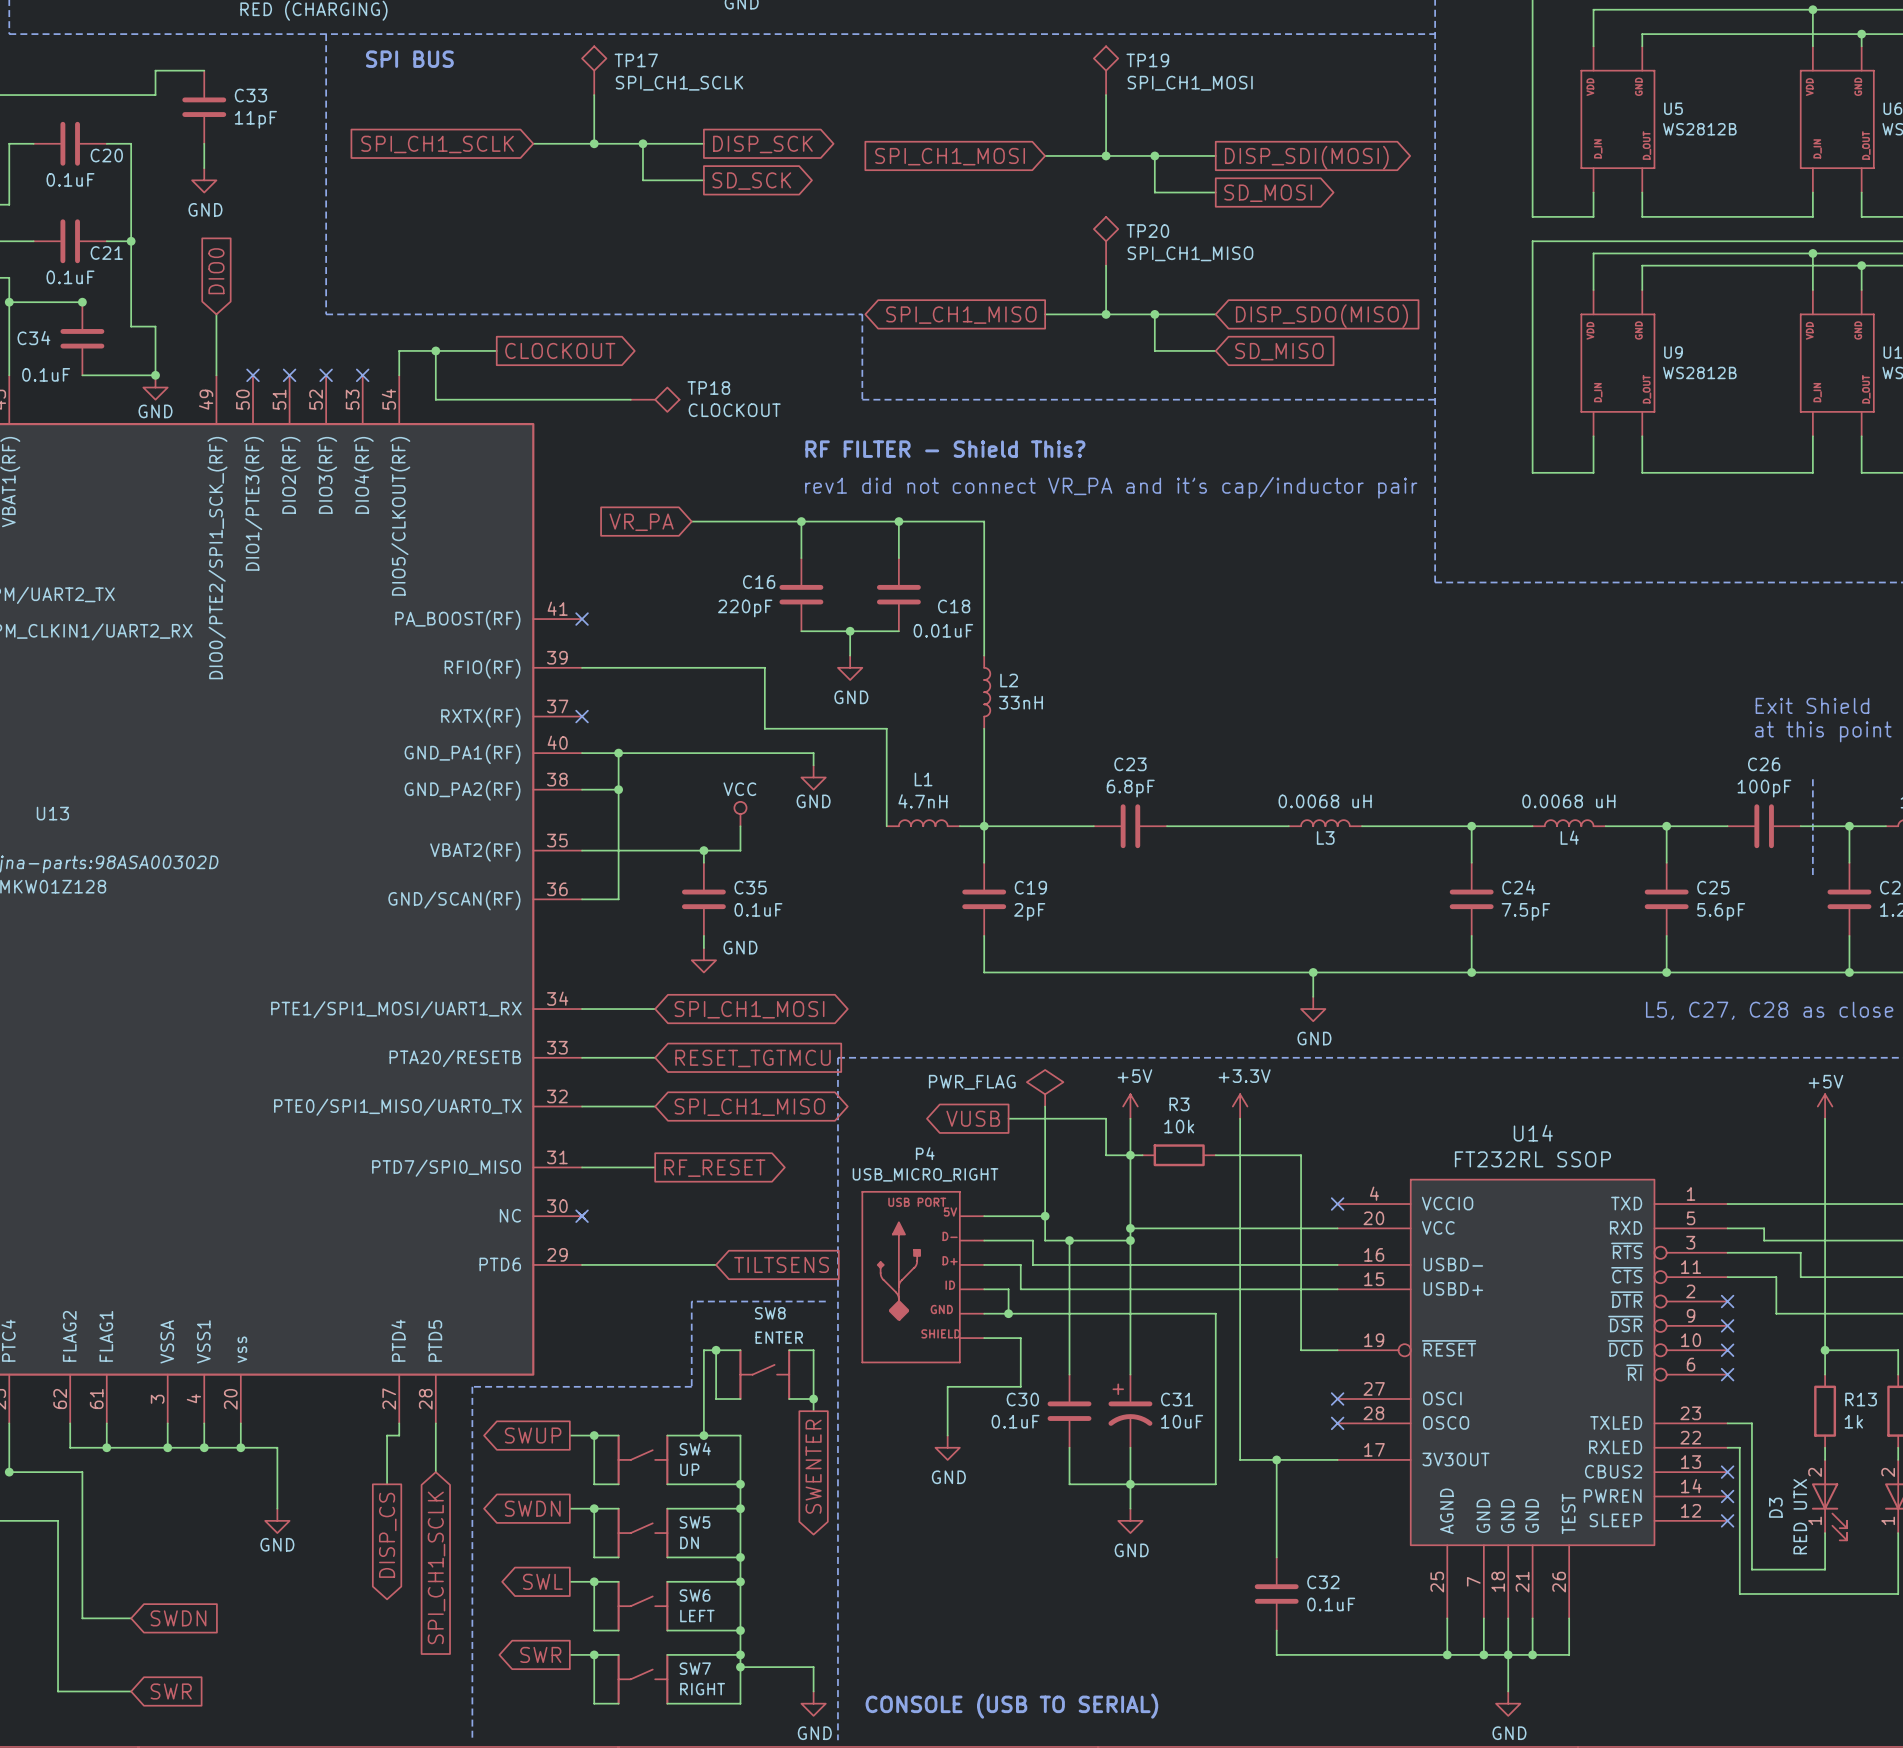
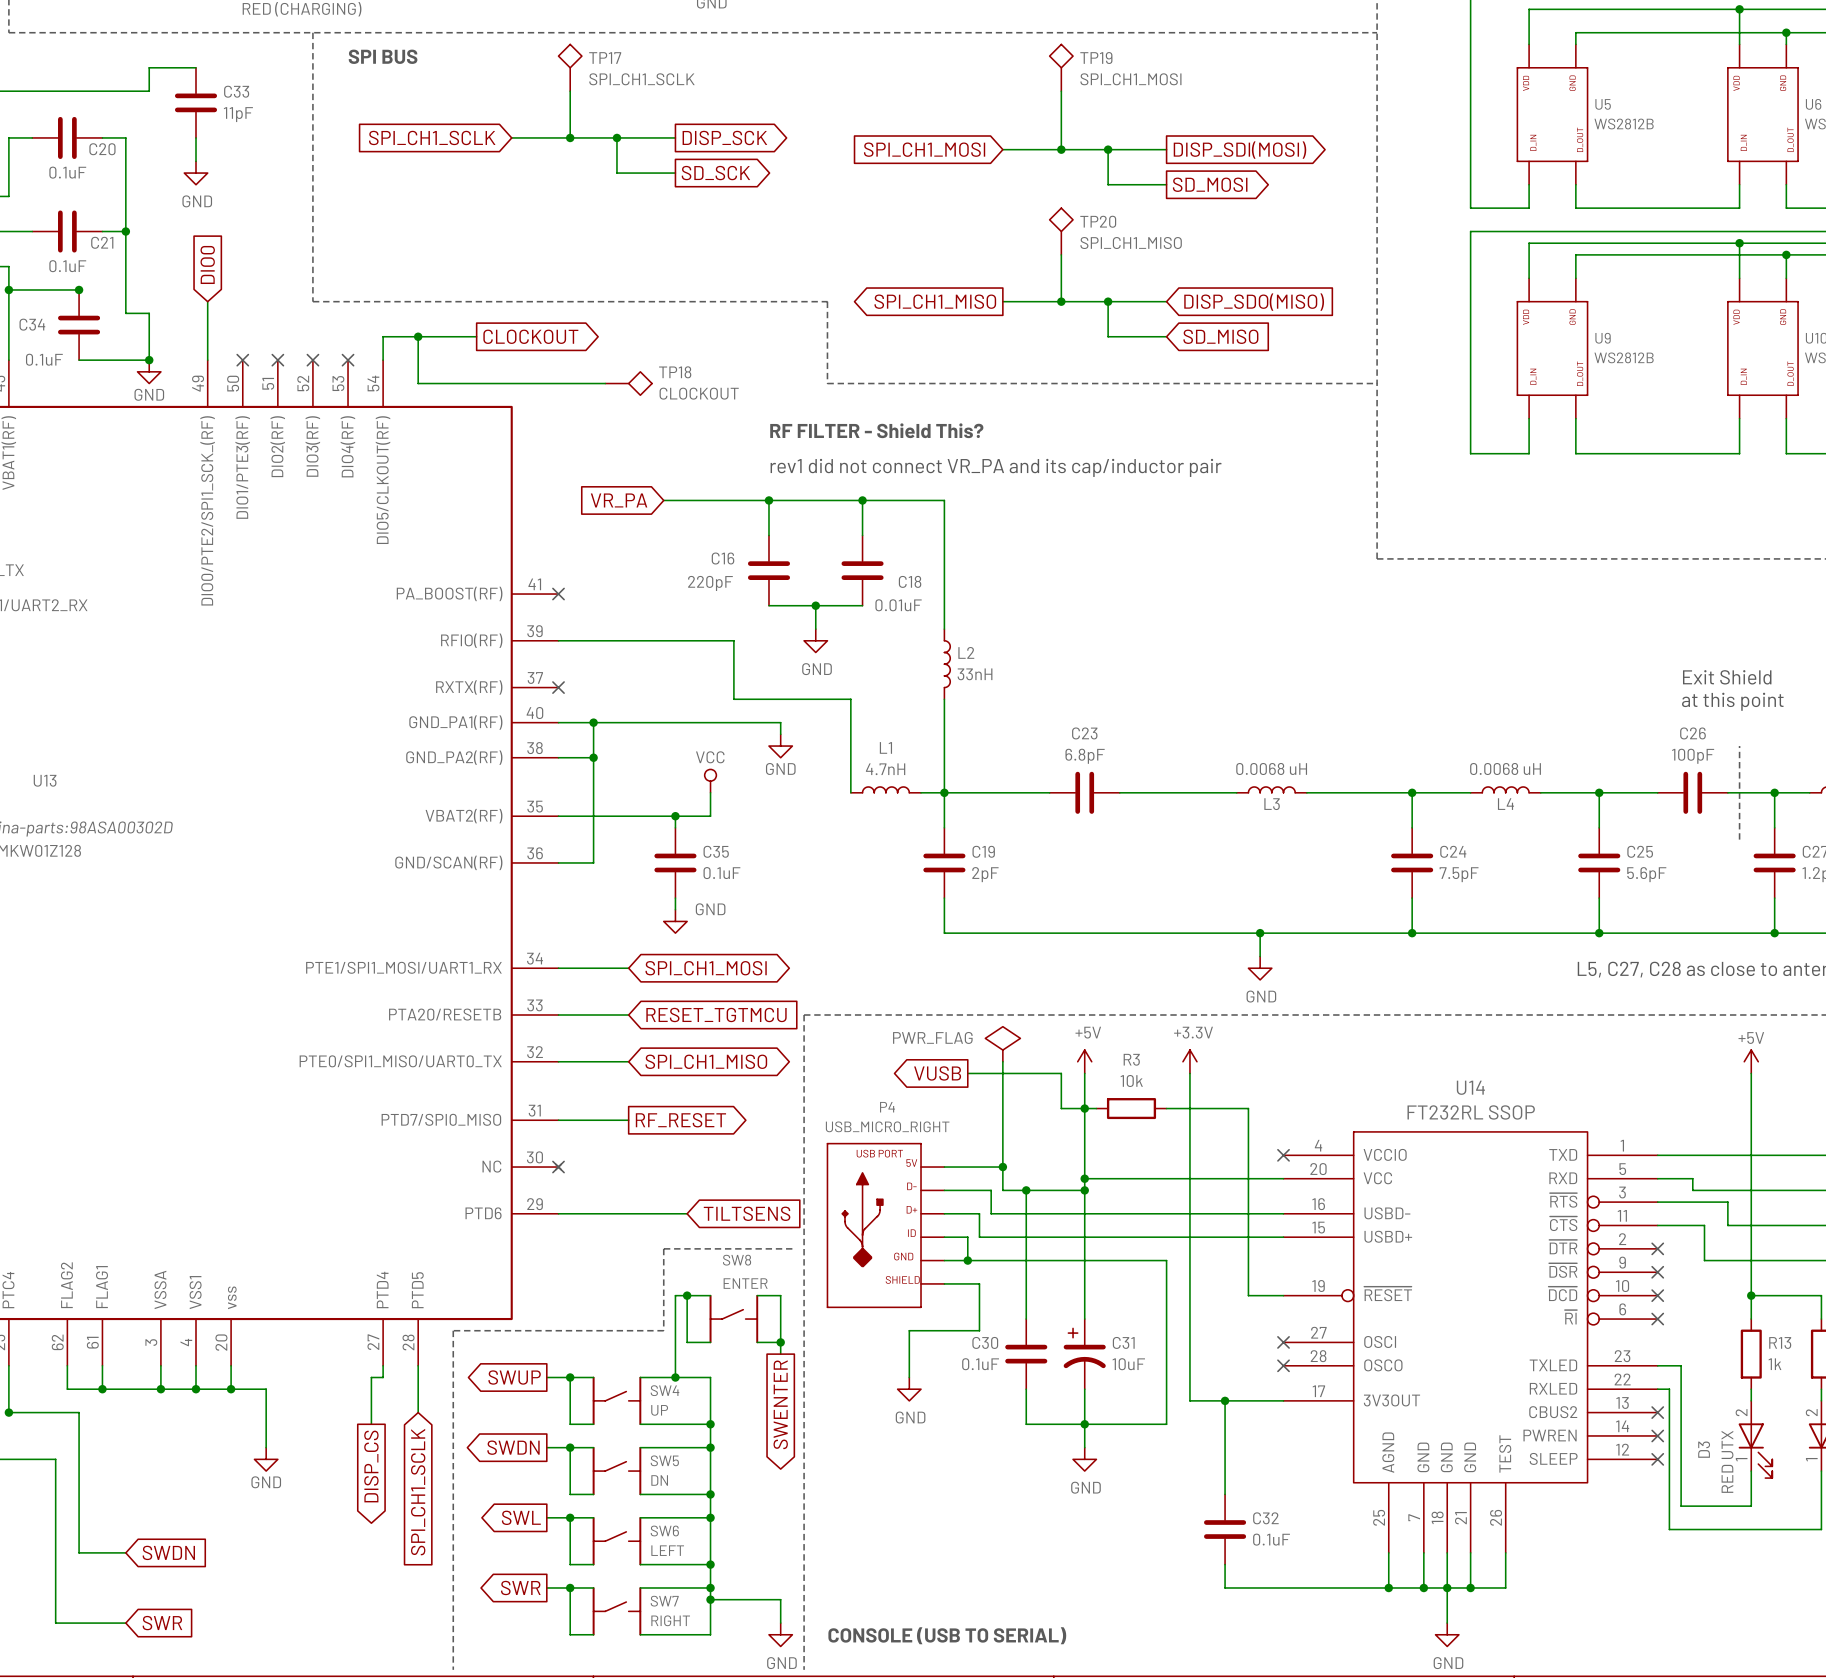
text: rev1 did not connect VR_PA and it’s cap/inductor pair (1111, 487) -> rev1 did not connect VR_PA and its cap/inductor pair (996, 467)

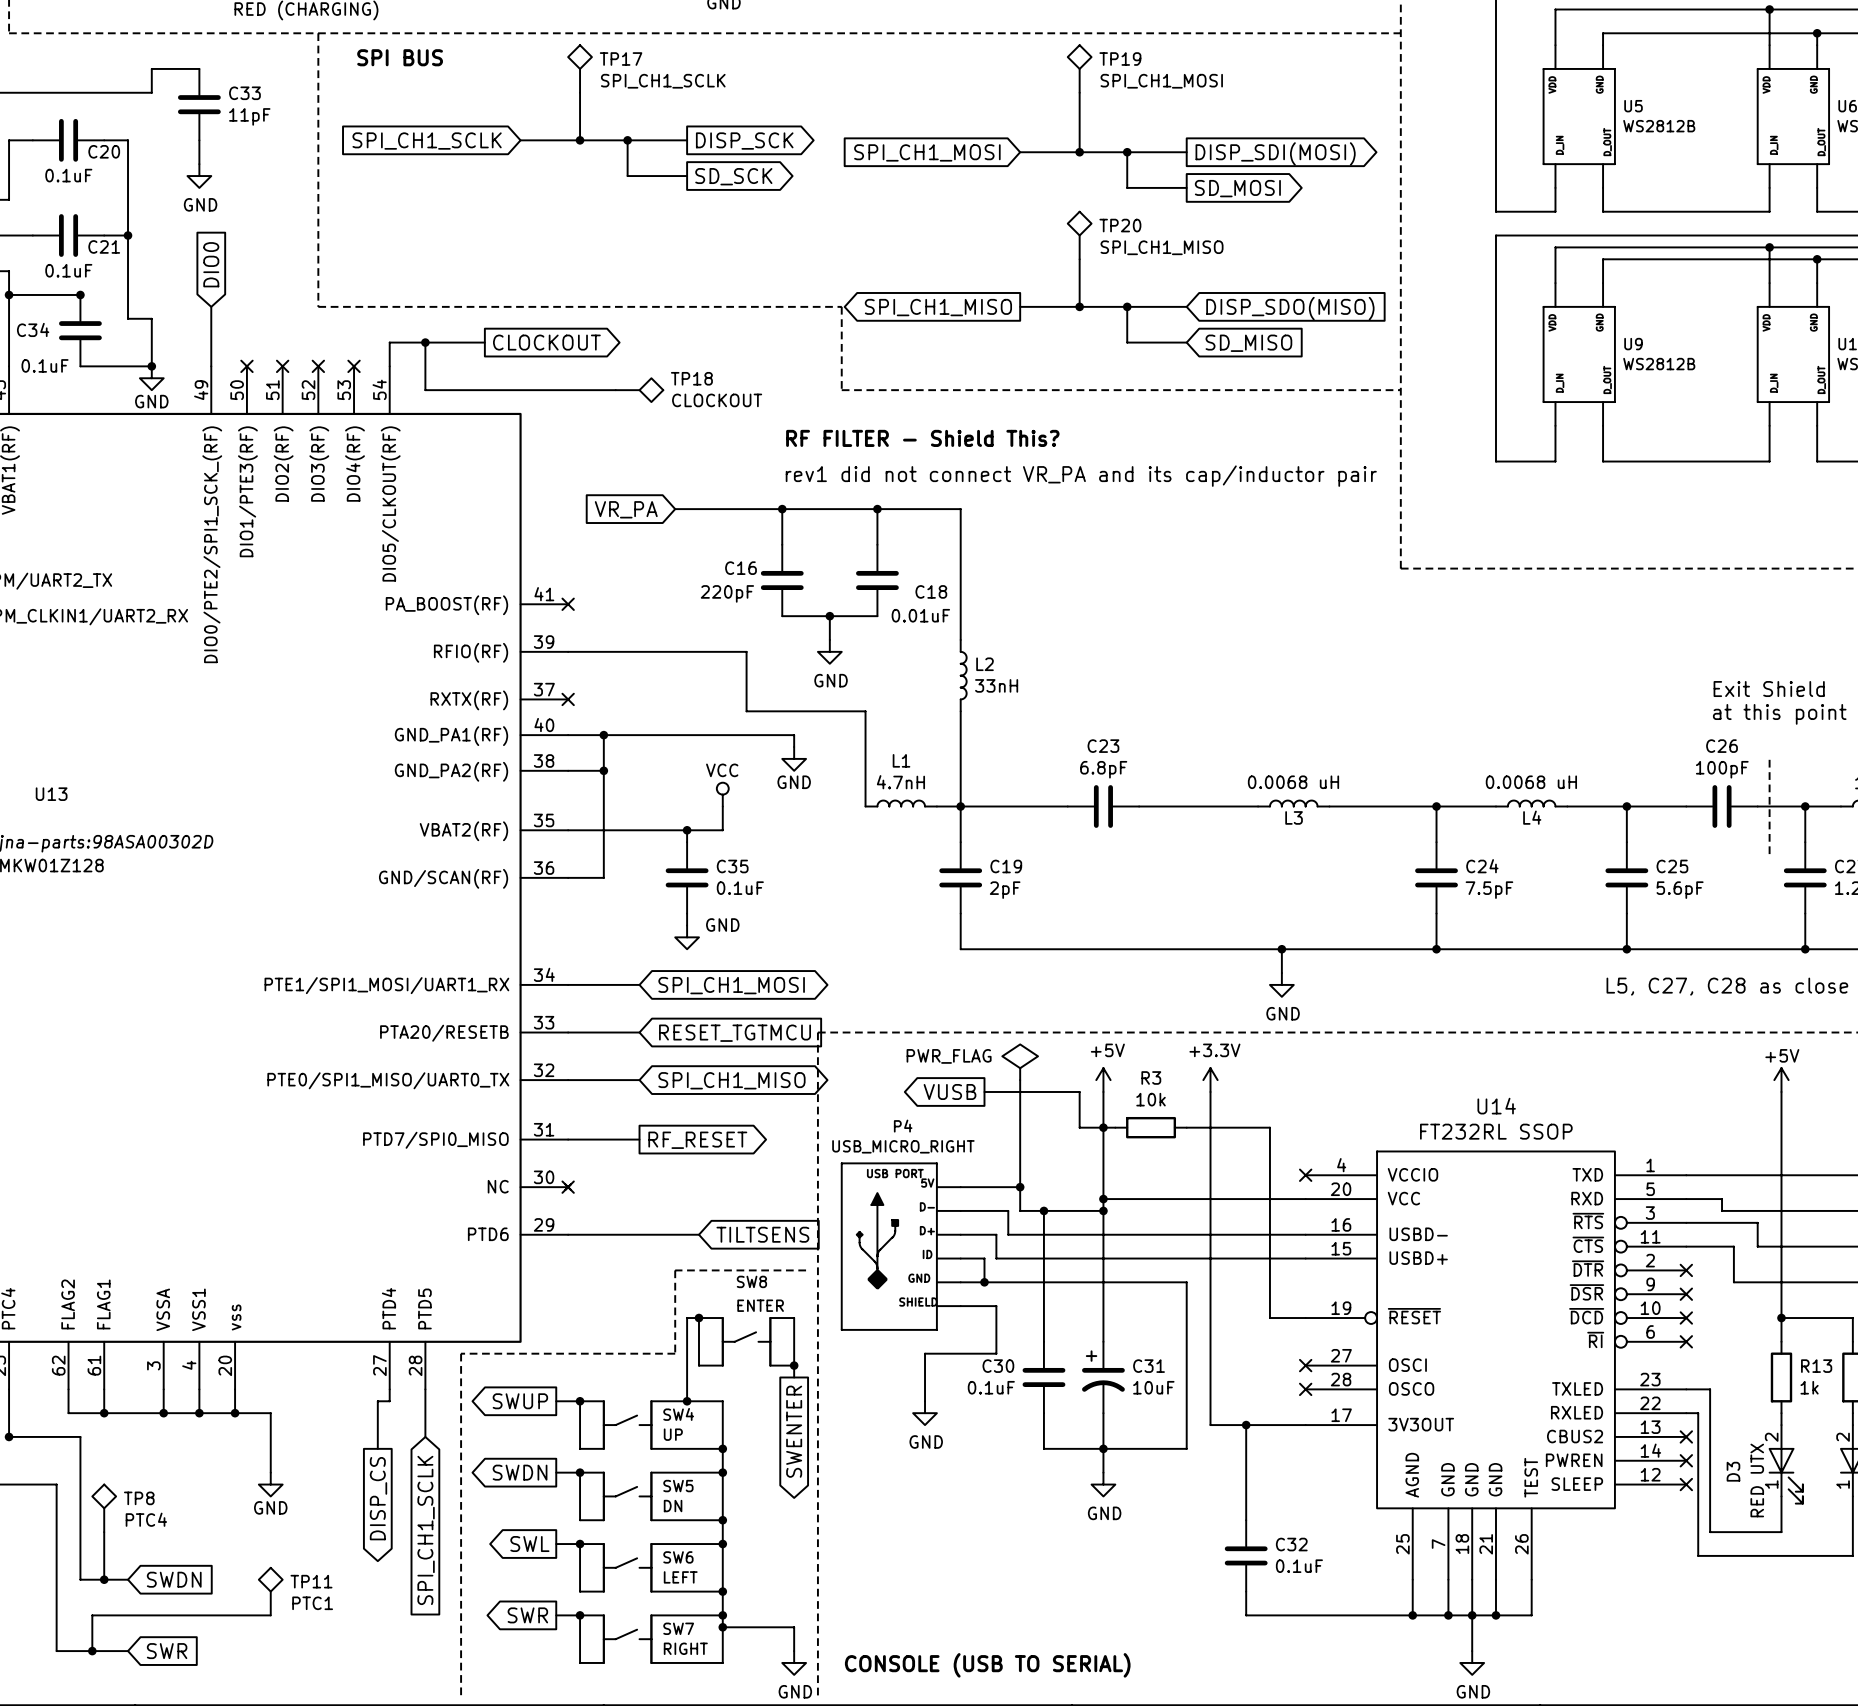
TP8: none -> PTC4 (104, 1508)
wire: none -> (104, 1532) (104, 1579)
junction: none -> (104, 1579)
TP11: none -> PTC1 (270, 1591)
wire: none -> (270, 1615) (92, 1615) (92, 1651)
junction: none -> (92, 1651)

